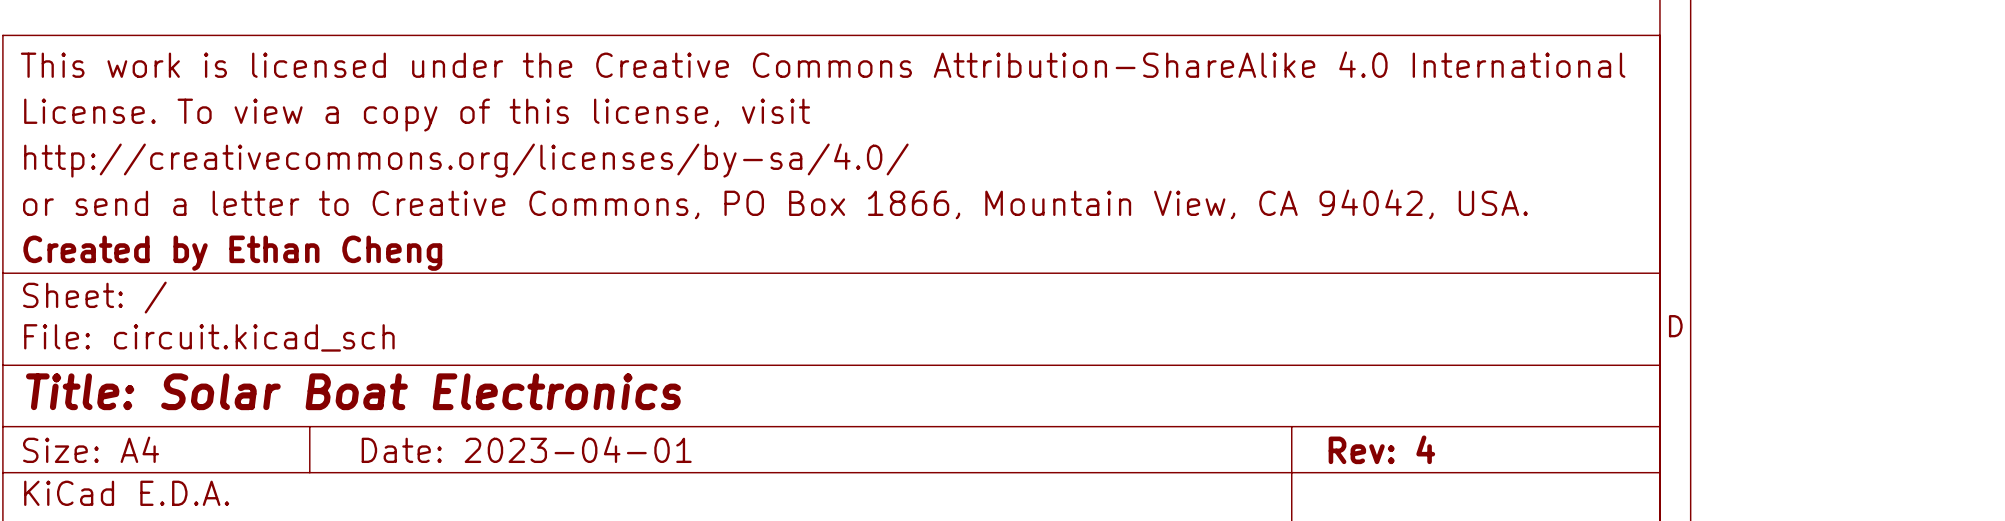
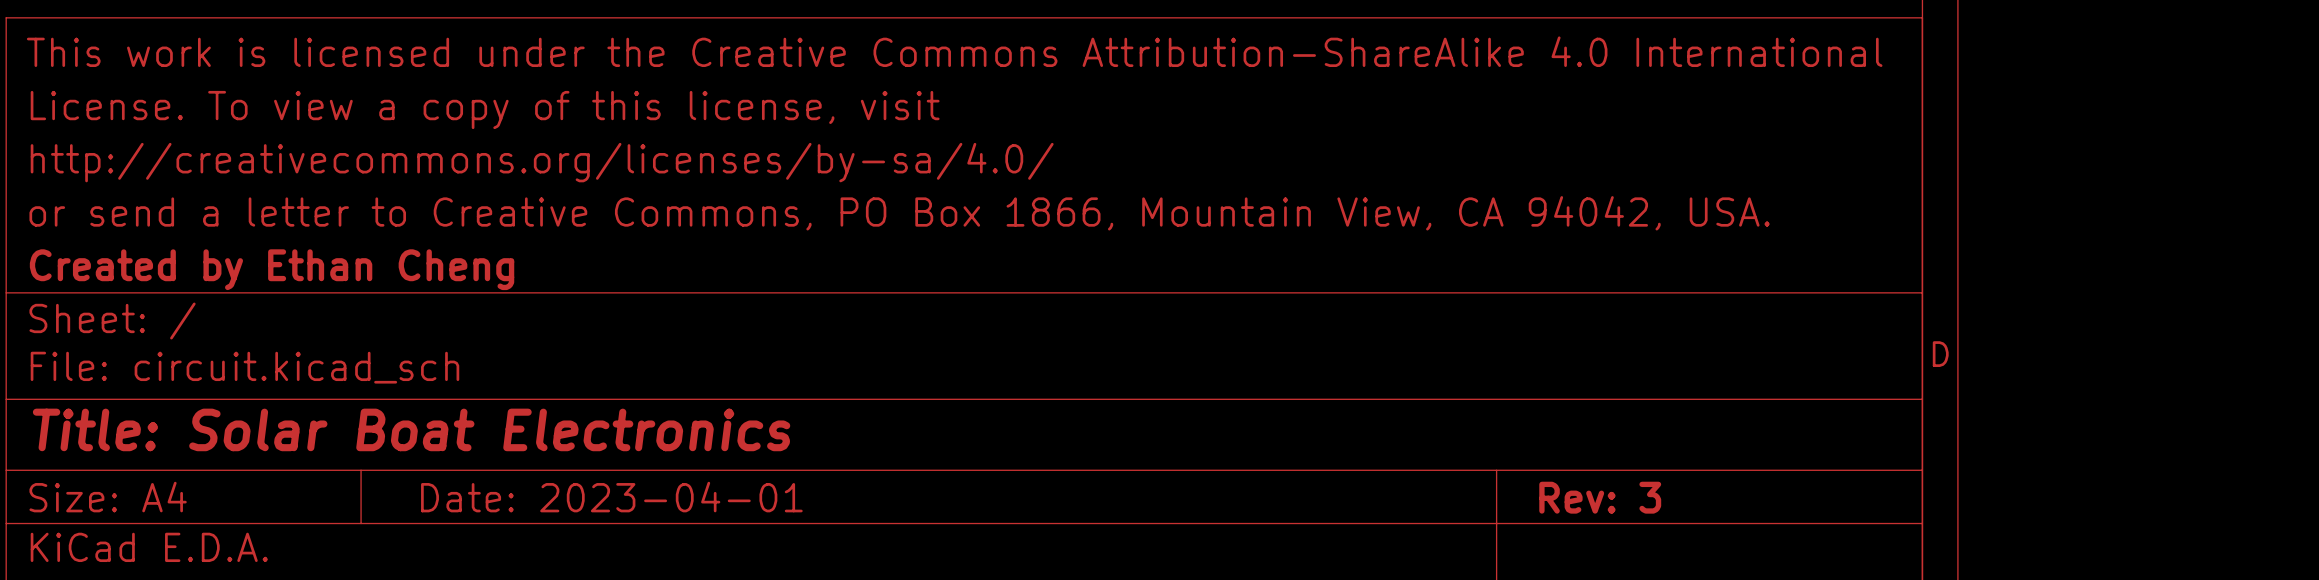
title block: Rev: 4 (1381, 449) -> Rev: 3 (1600, 497)

